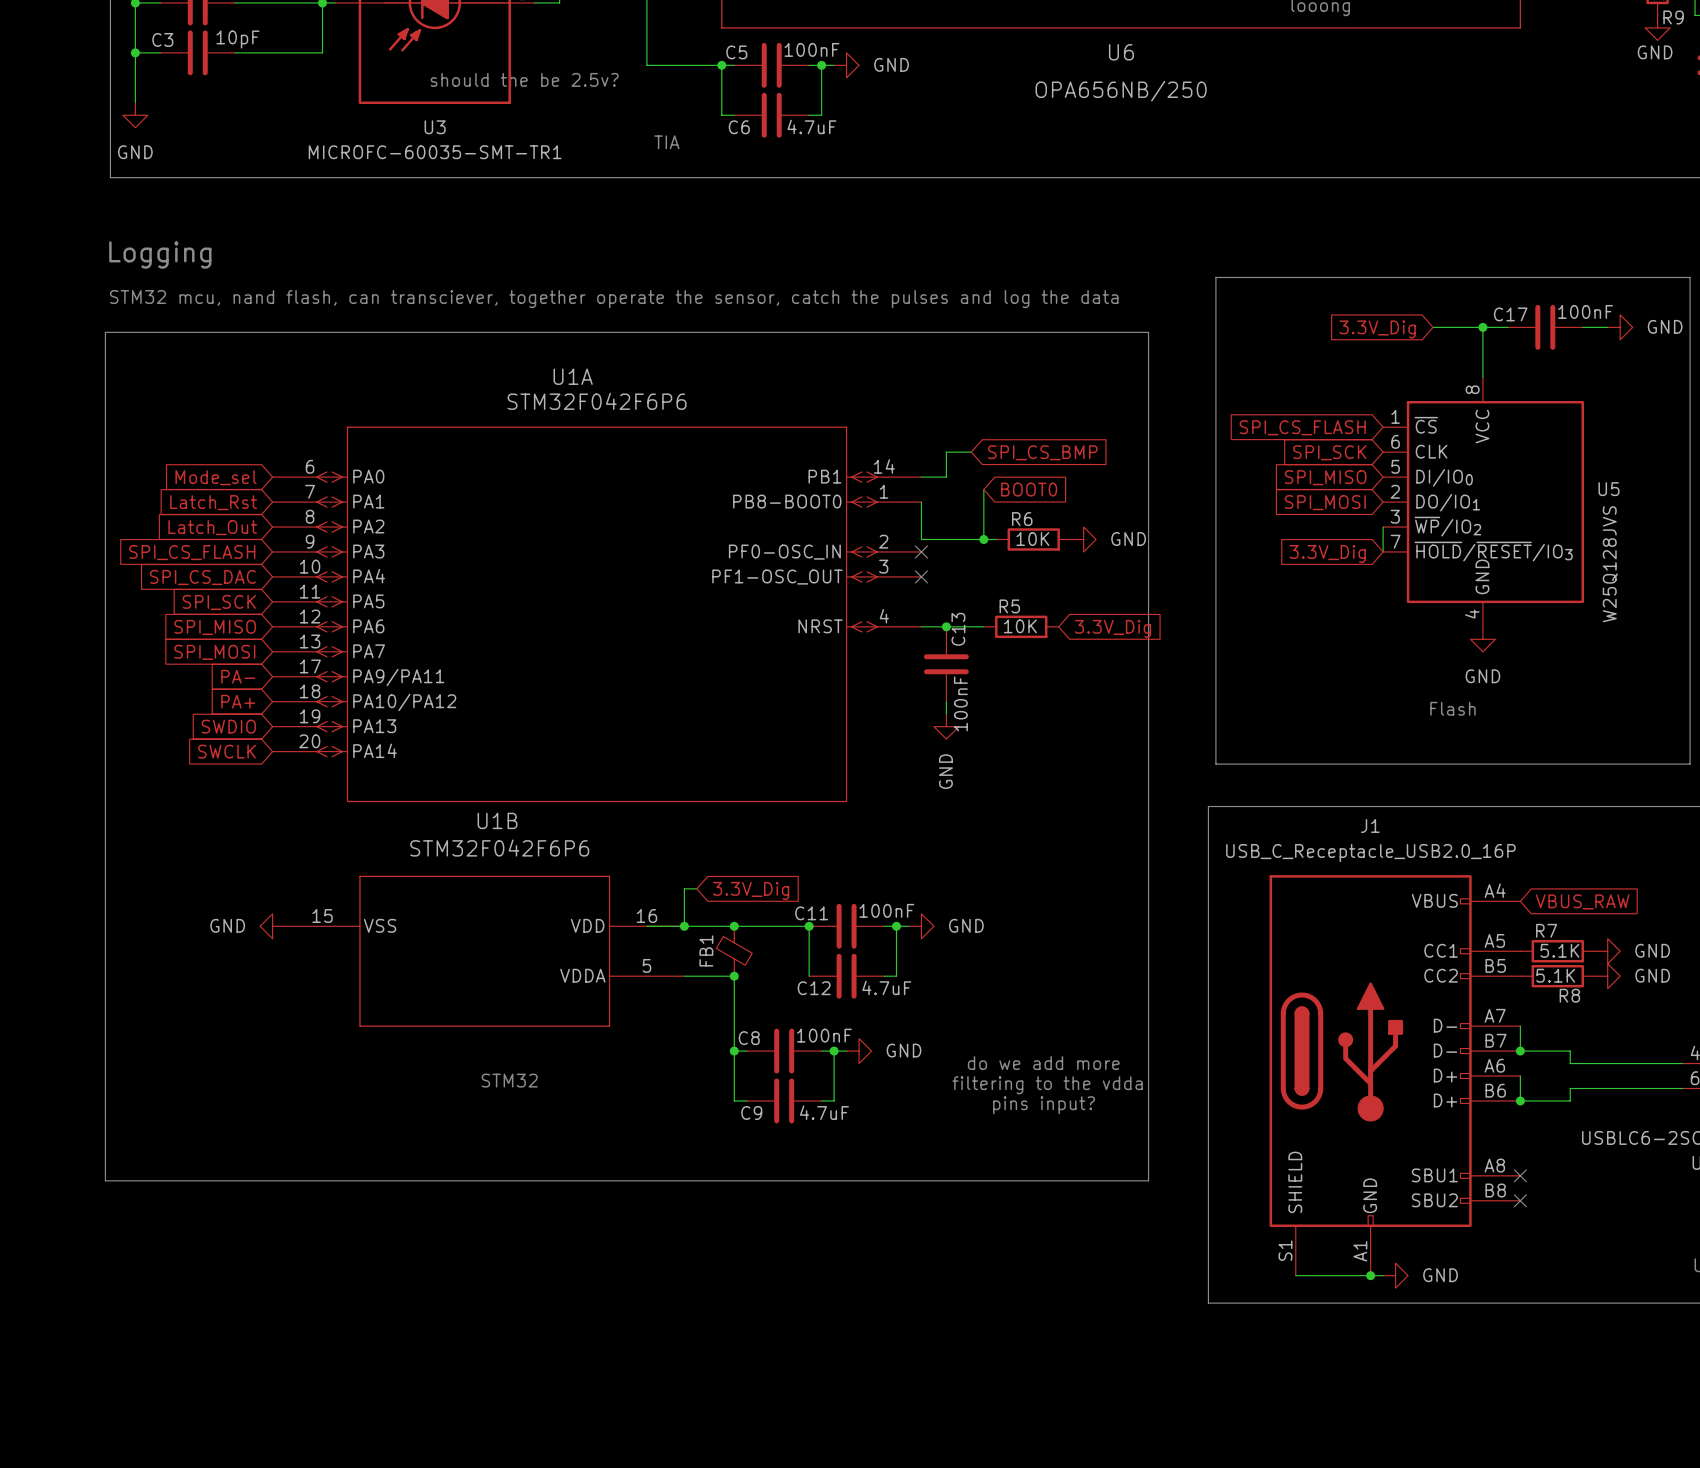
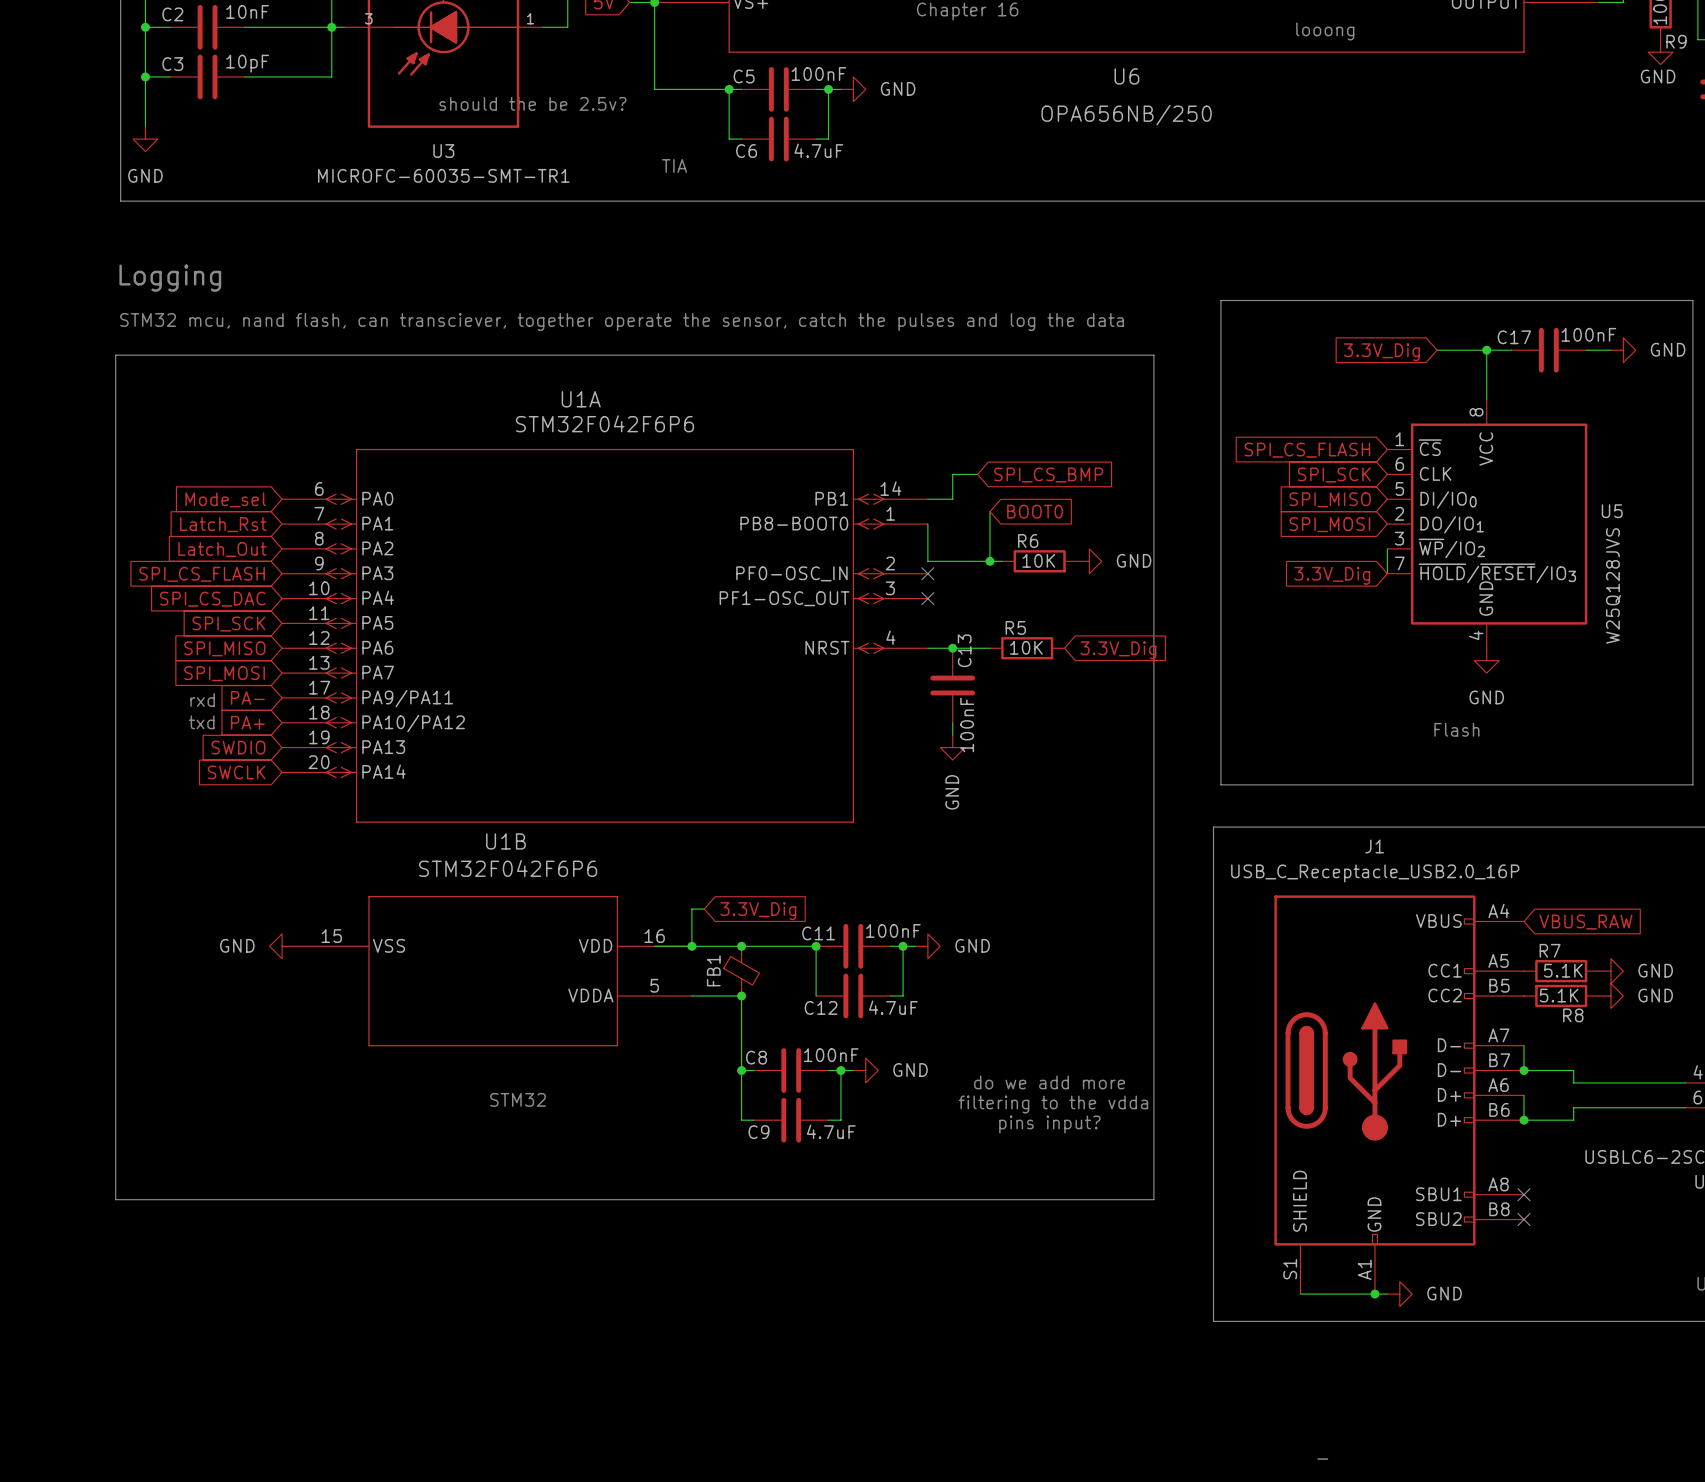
text: none -> rxd (202, 699)
text: none -> txd (201, 722)
text: none -> - (1322, 1459)

